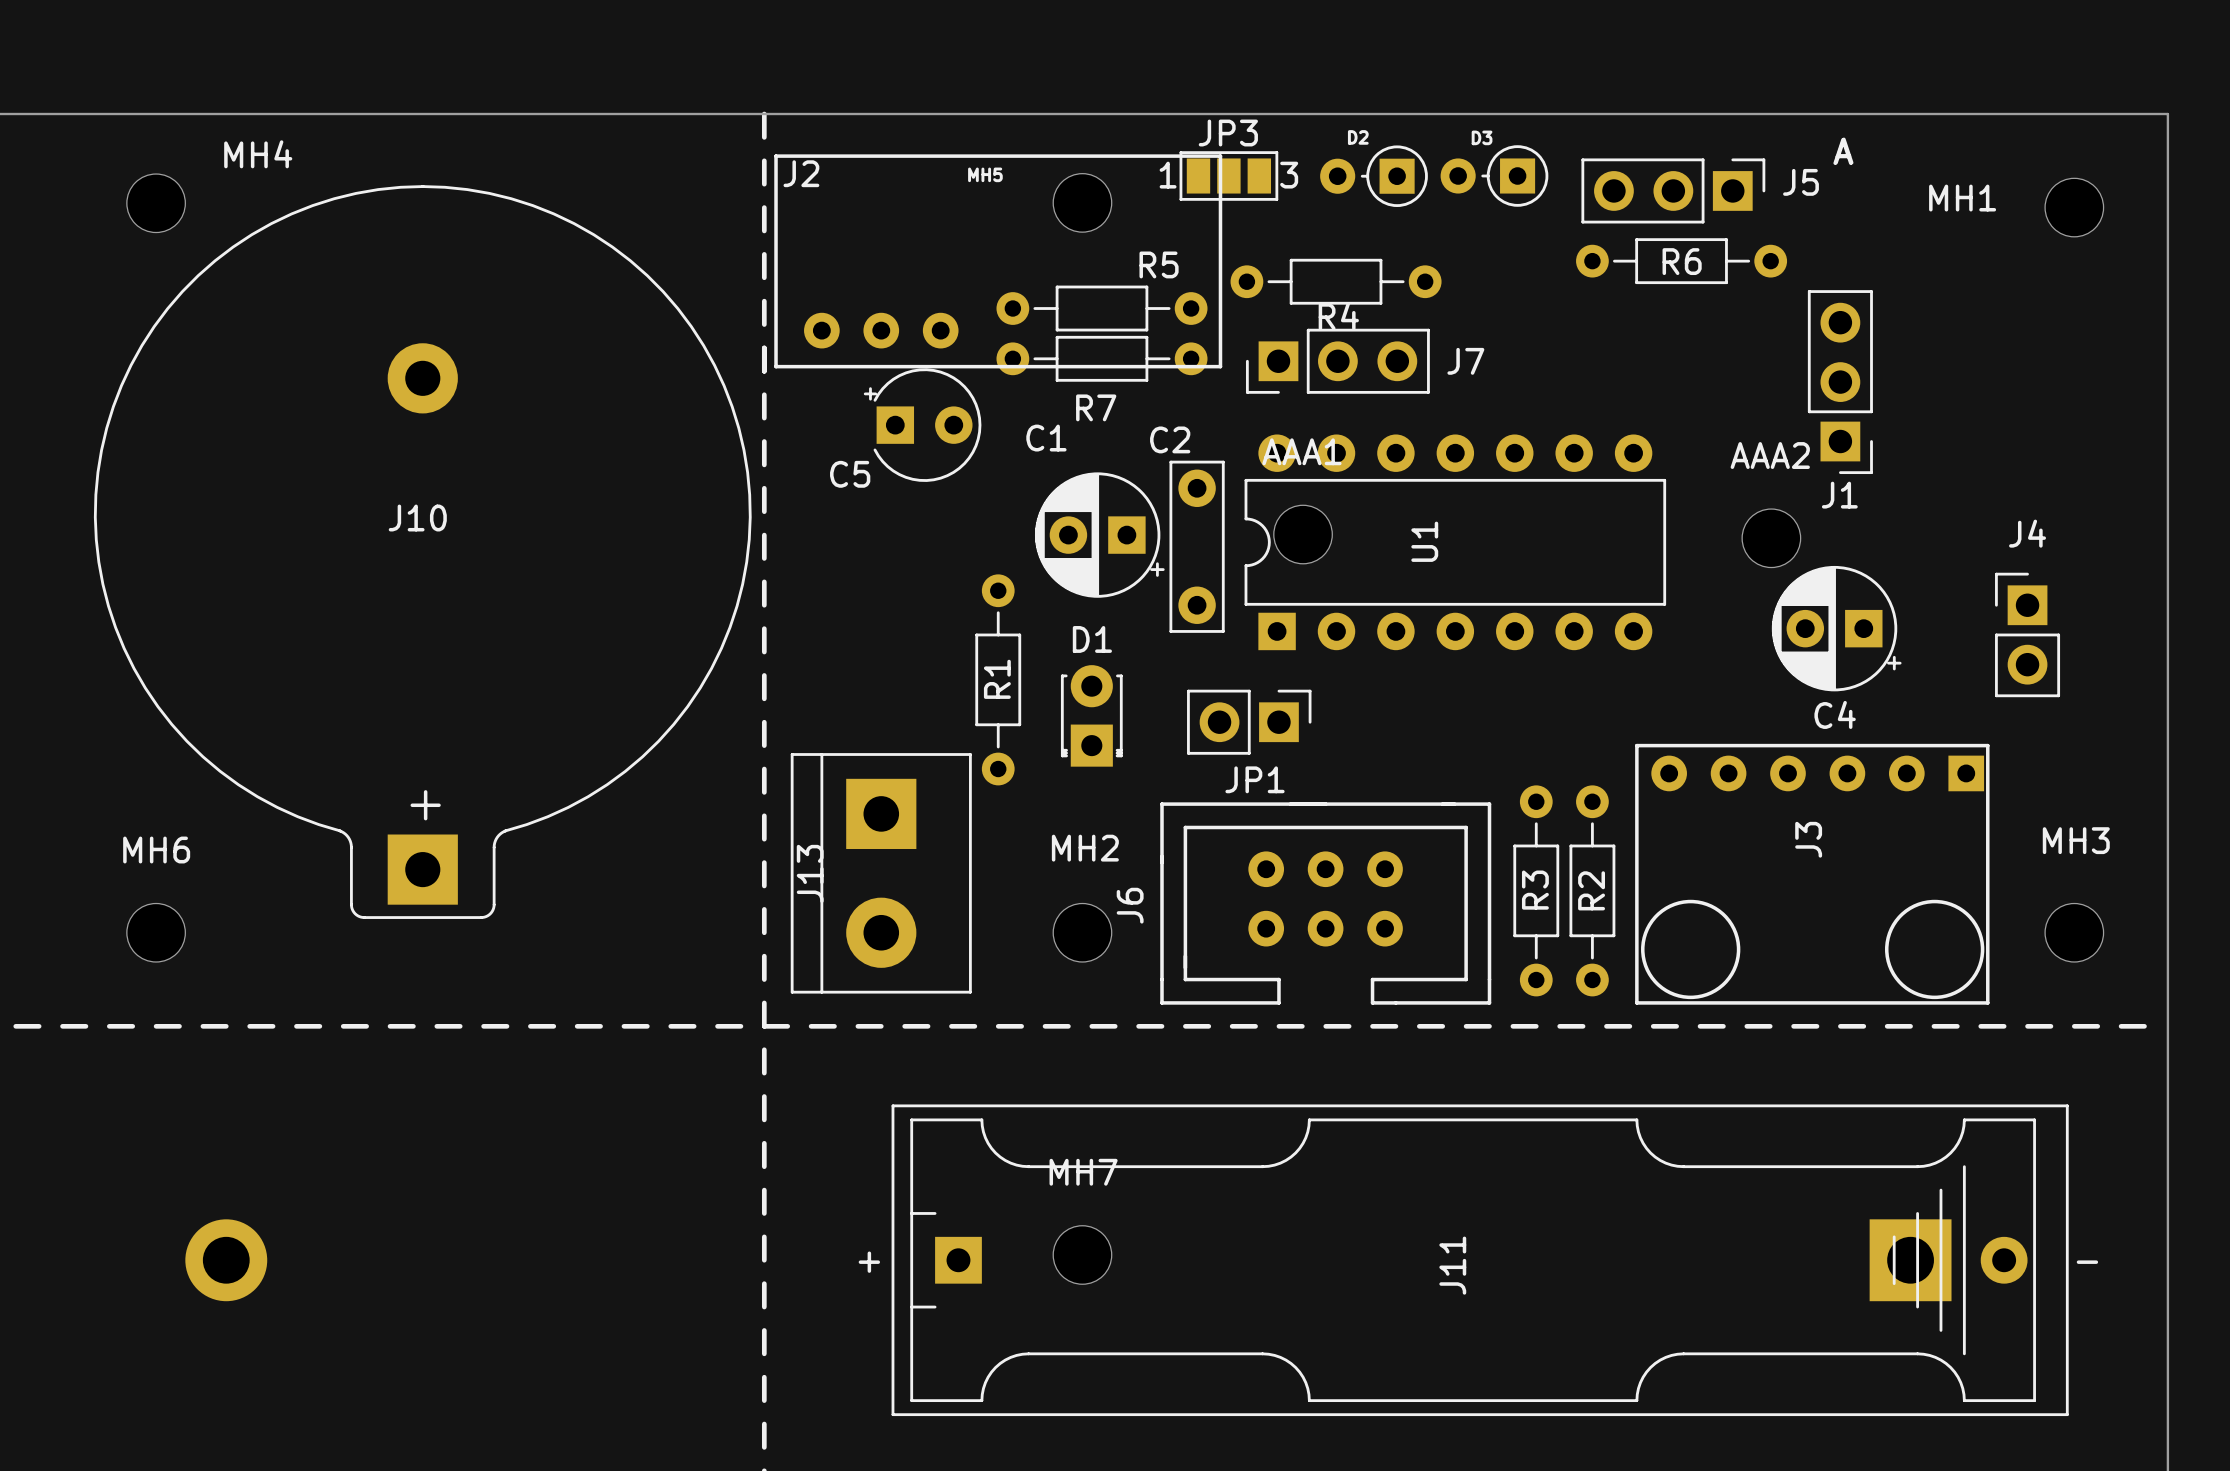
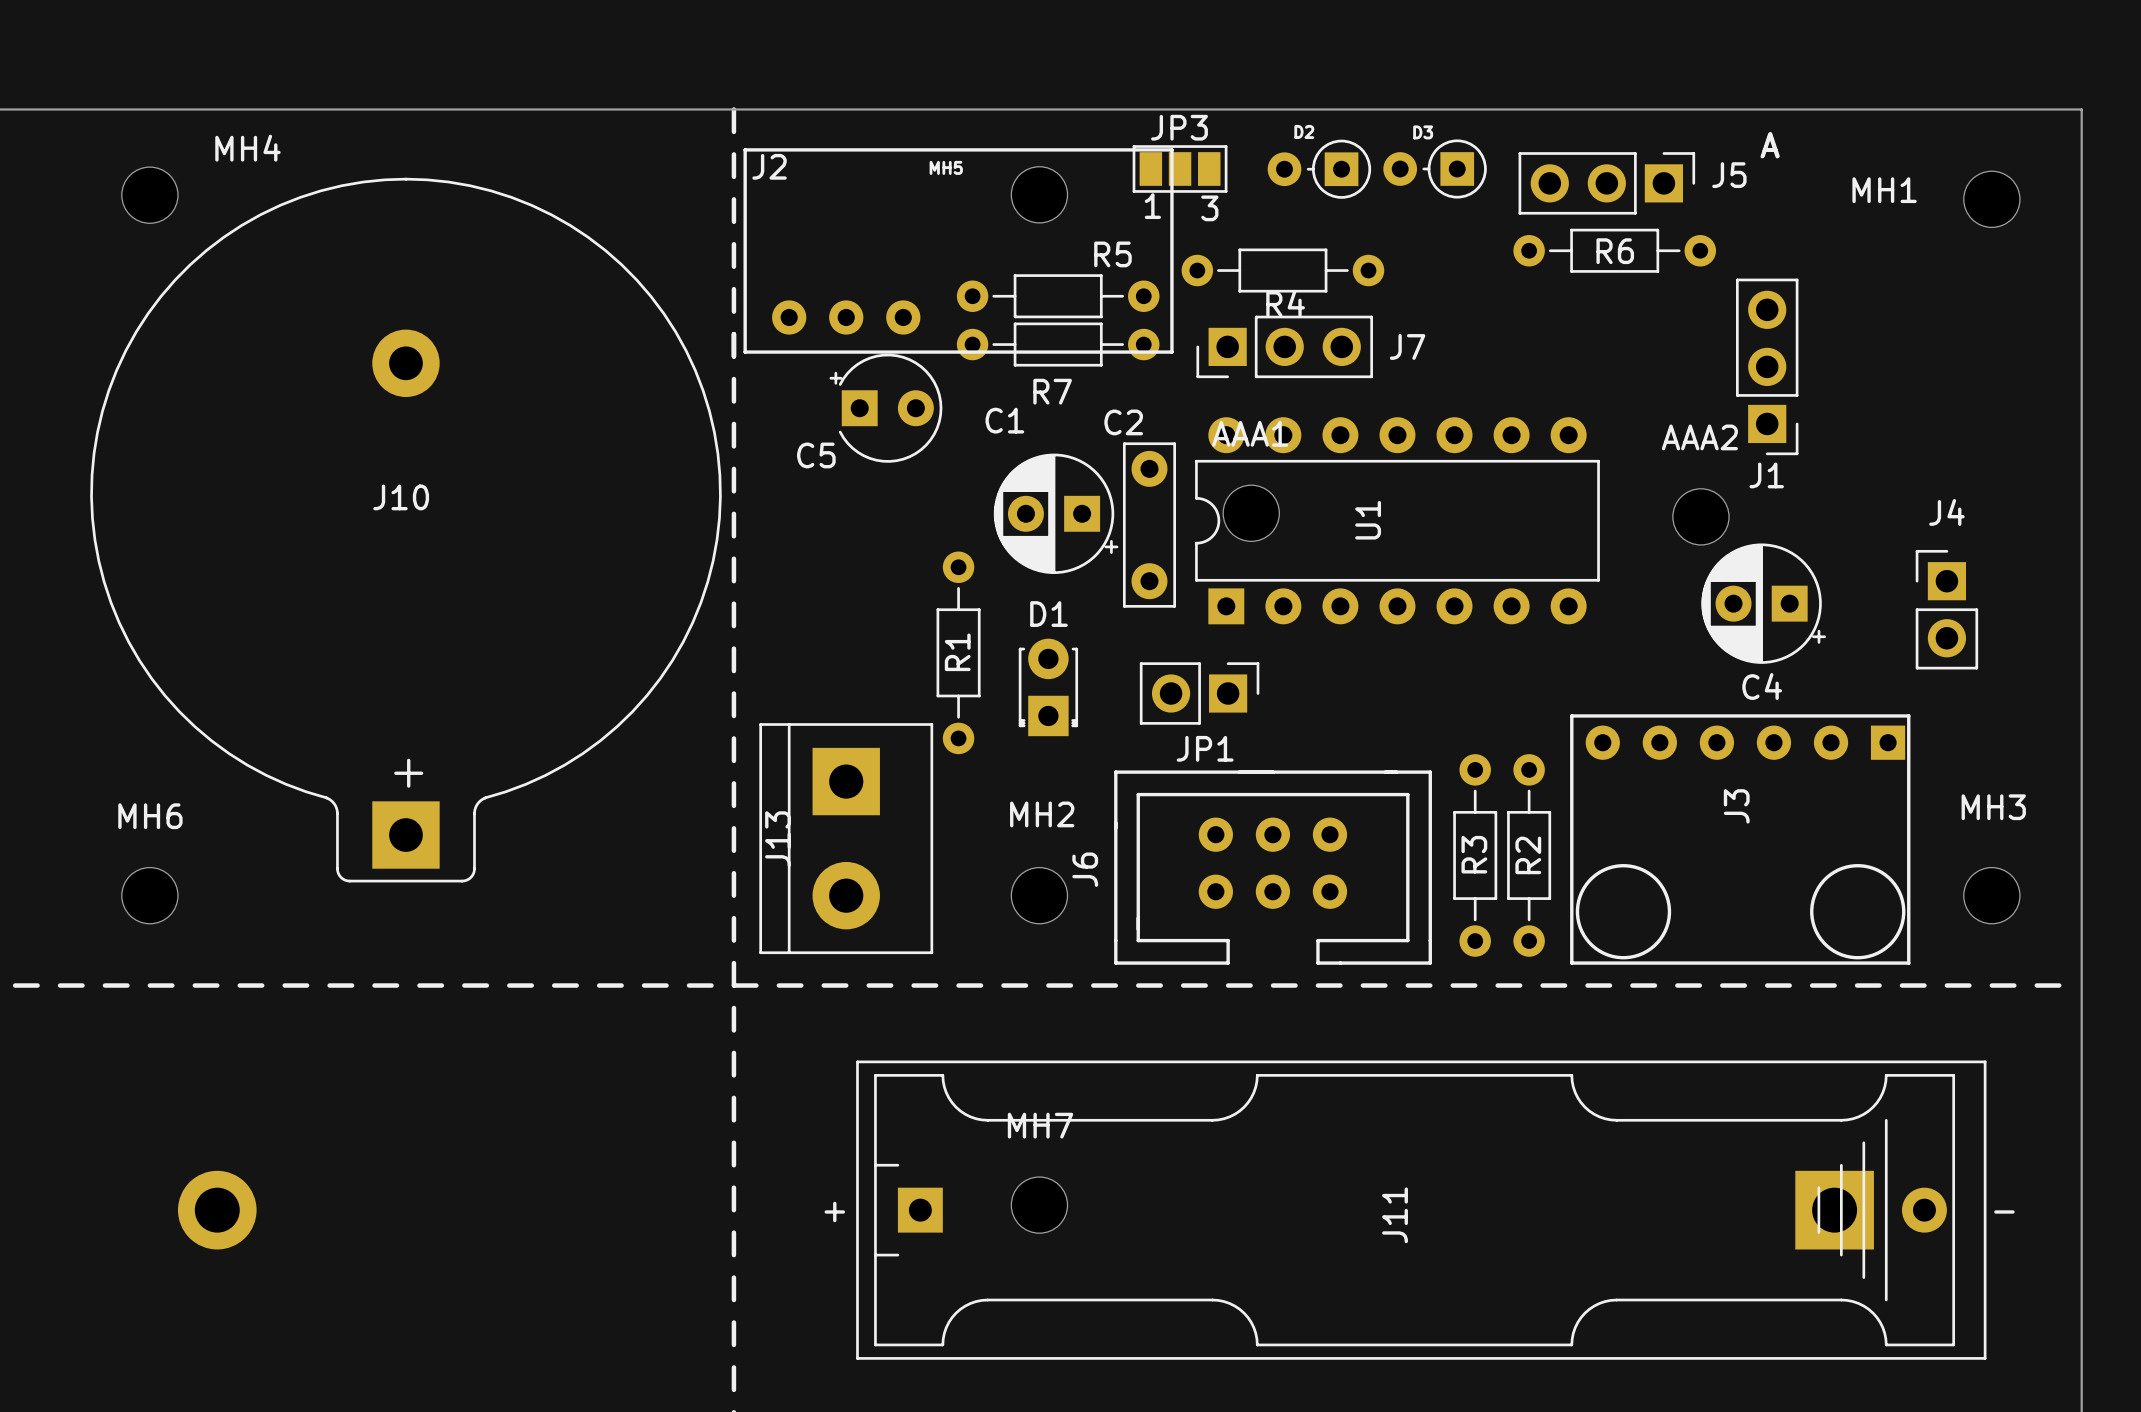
JP3 text position: 1 (1168, 175) -> 1 (1152, 206)
JP3 text position: 3 (1289, 175) -> 3 (1209, 208)

